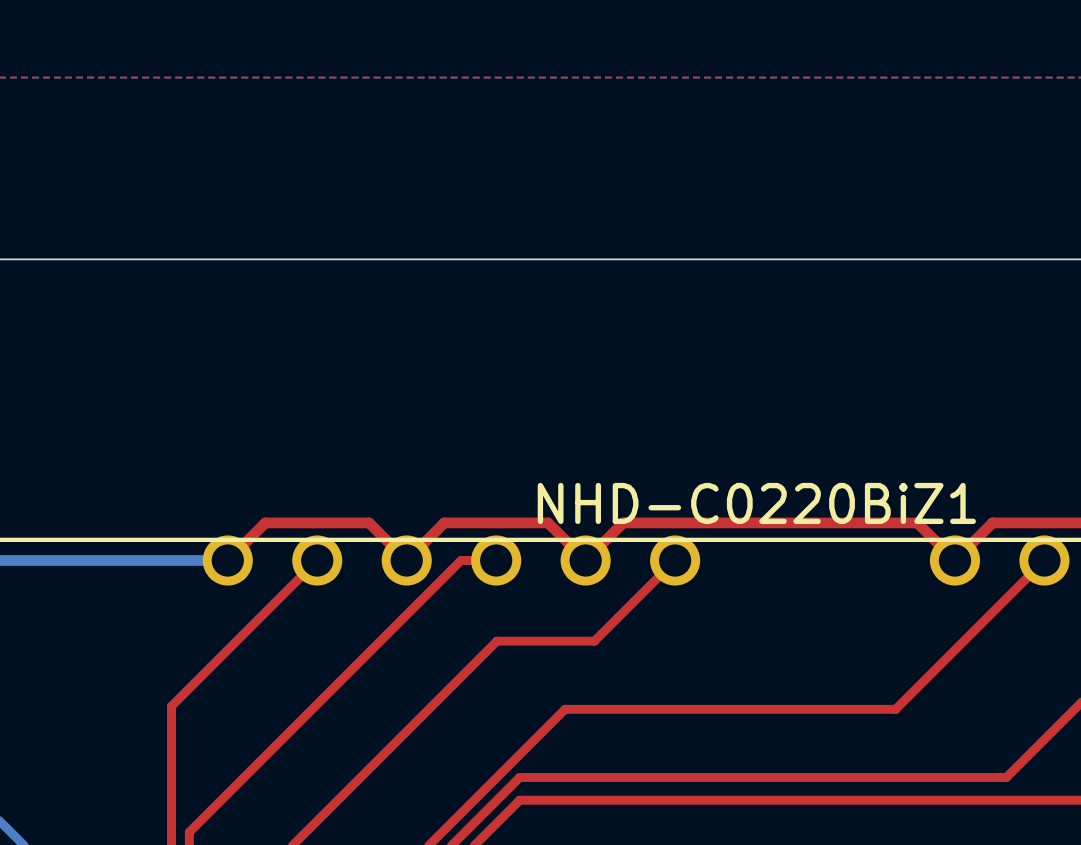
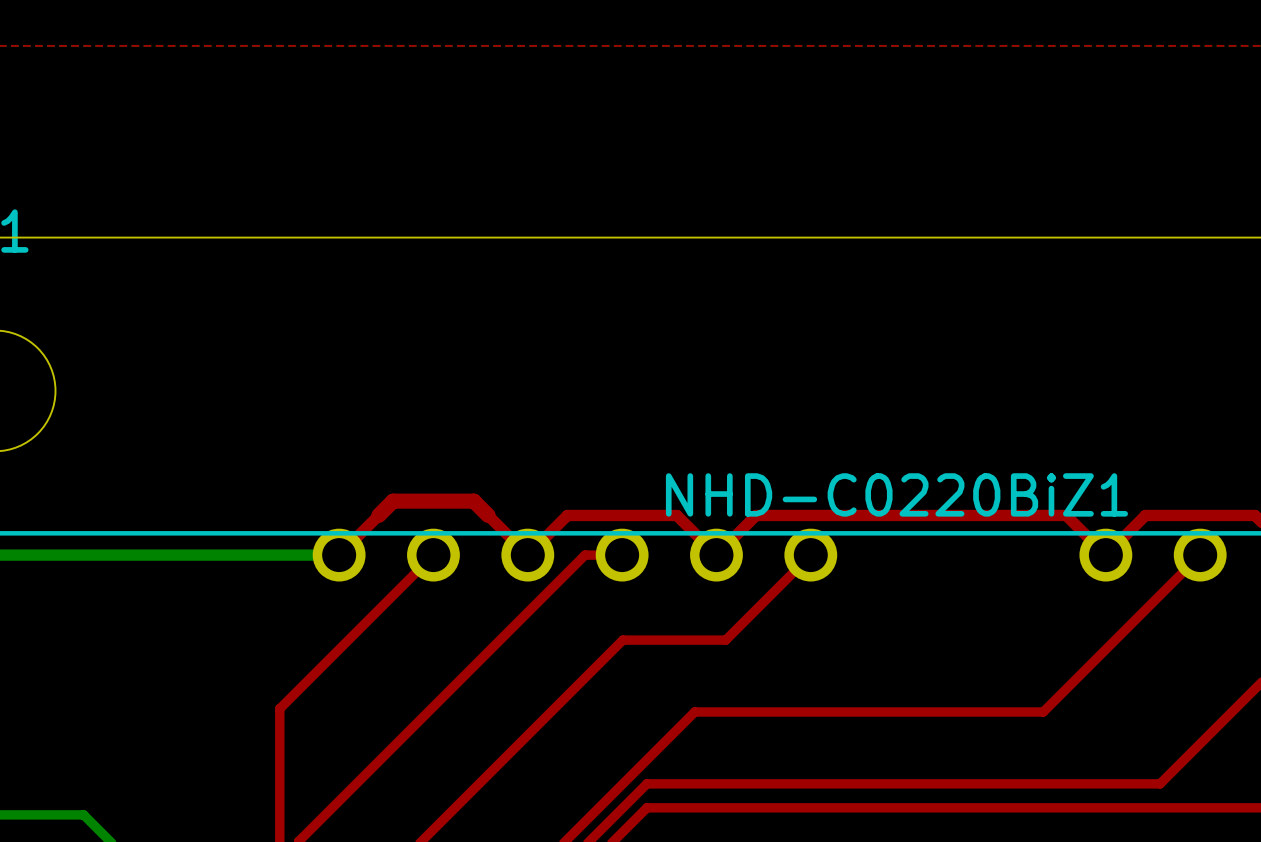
top track: (265, 522) (369, 522) -> (378, 515) (393, 501) (473, 501) (488, 515)

